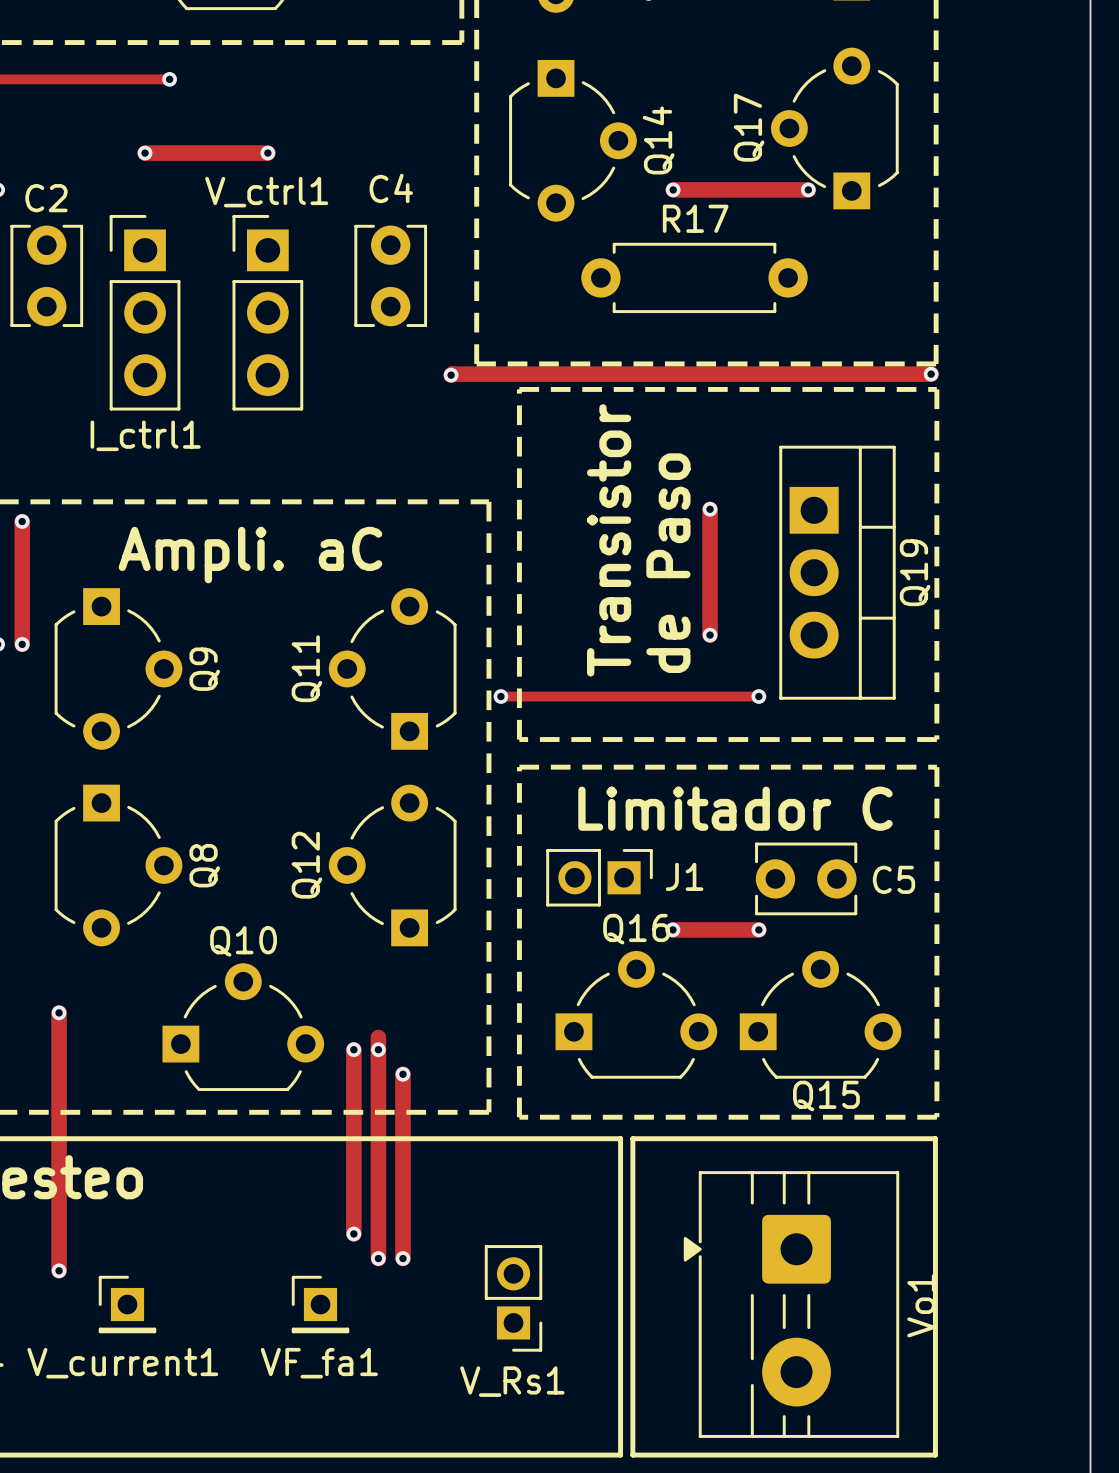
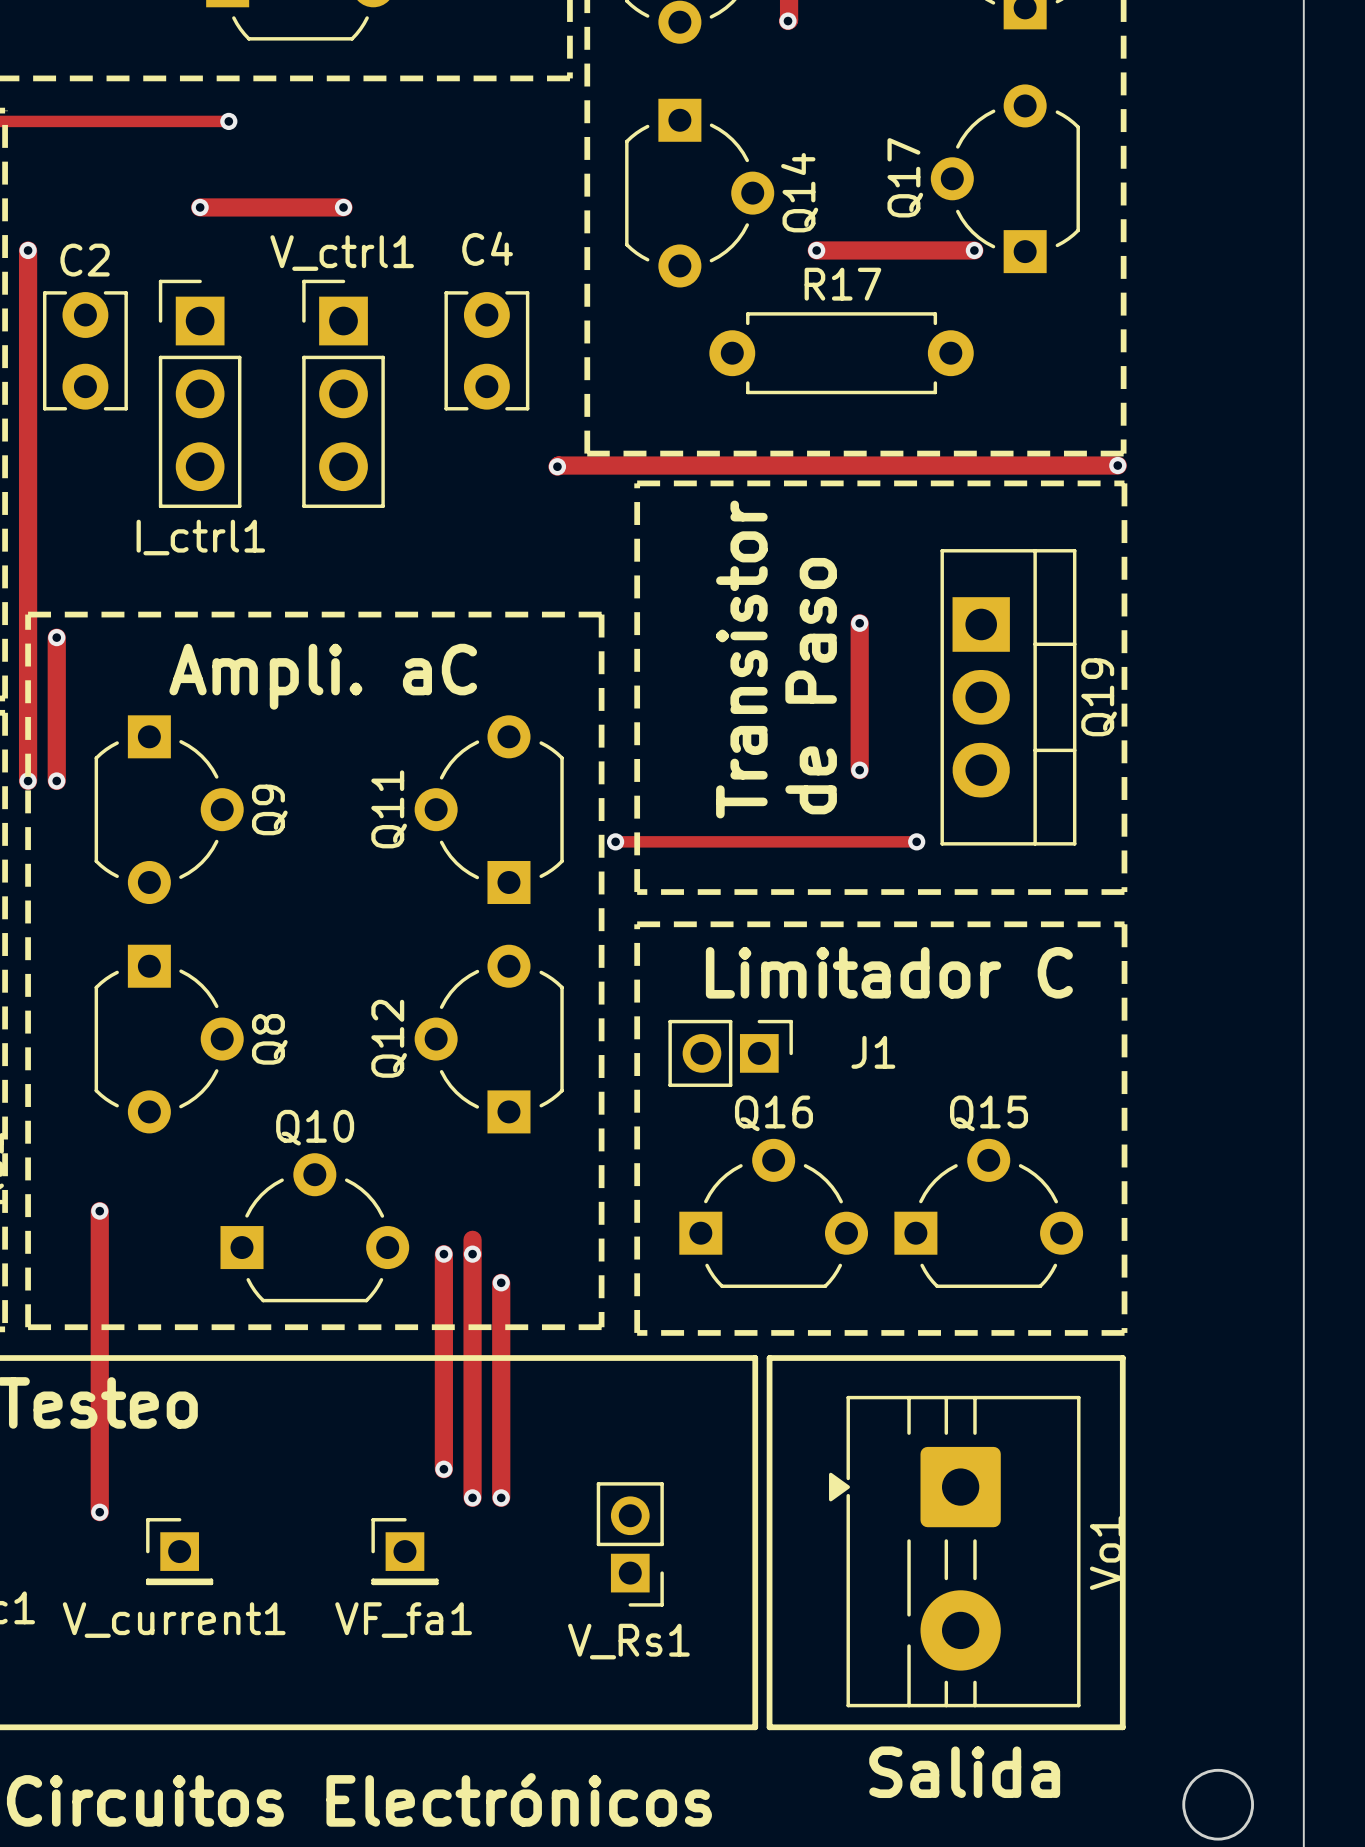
J1 name position: J1 (684, 876) -> J1 (873, 1052)
C5: (806, 878) -> none
track: (672, 929) (758, 929) -> none
via: (672, 929) -> none
via: (758, 929) -> none
Q15 name position: Q15 (826, 1095) -> Q15 (989, 1113)

